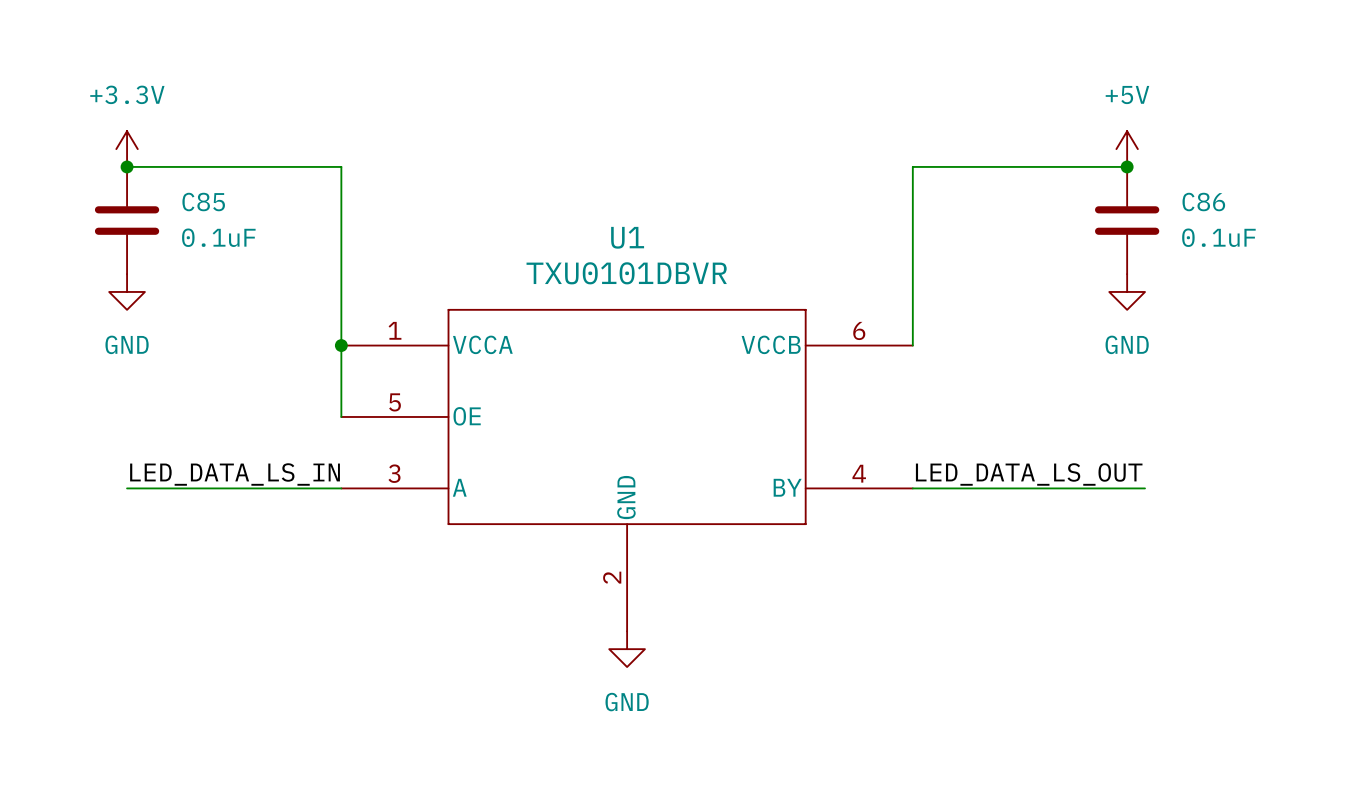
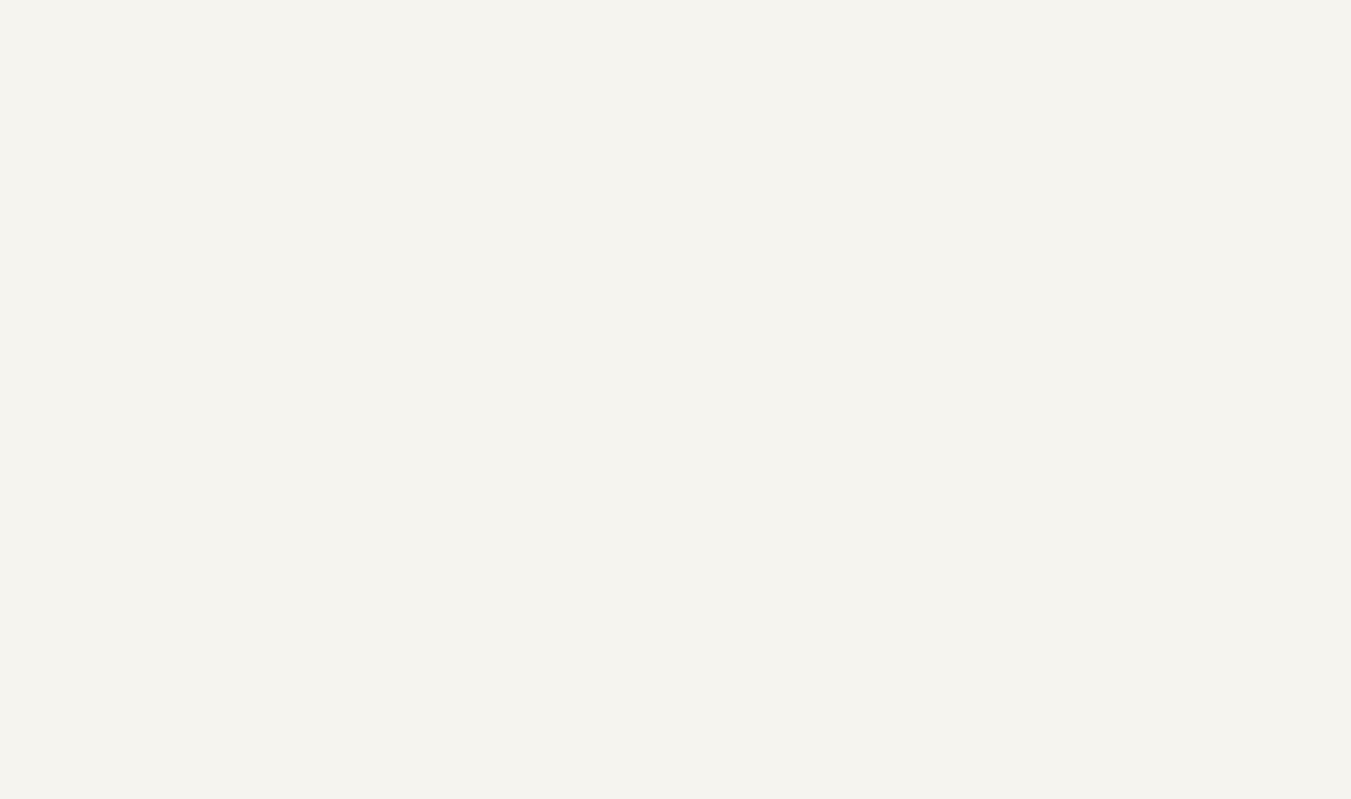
power symbol: +3.3V (127, 149) -> none
power symbol: +5V (1127, 149) -> none
wire: (127, 166) (341, 166) (341, 416) -> none
junction: (127, 166) -> none
wire: (1127, 166) (912, 166) (912, 345) -> none
junction: (1127, 166) -> none
C85: 0.1uF (127, 220) -> none
C86: 0.1uF (1127, 220) -> none
power symbol: GND (127, 291) -> none
power symbol: GND (1127, 291) -> none
junction: (341, 345) -> none
U1: TXU0101DBVR (627, 470) -> none
label: LED_DATA_LS_IN (235, 474) -> none
label: LED_DATA_LS_OUT (1029, 474) -> none
wire: (127, 488) (341, 488) -> none
wire: (912, 488) (1145, 488) -> none
power symbol: GND (627, 649) -> none

